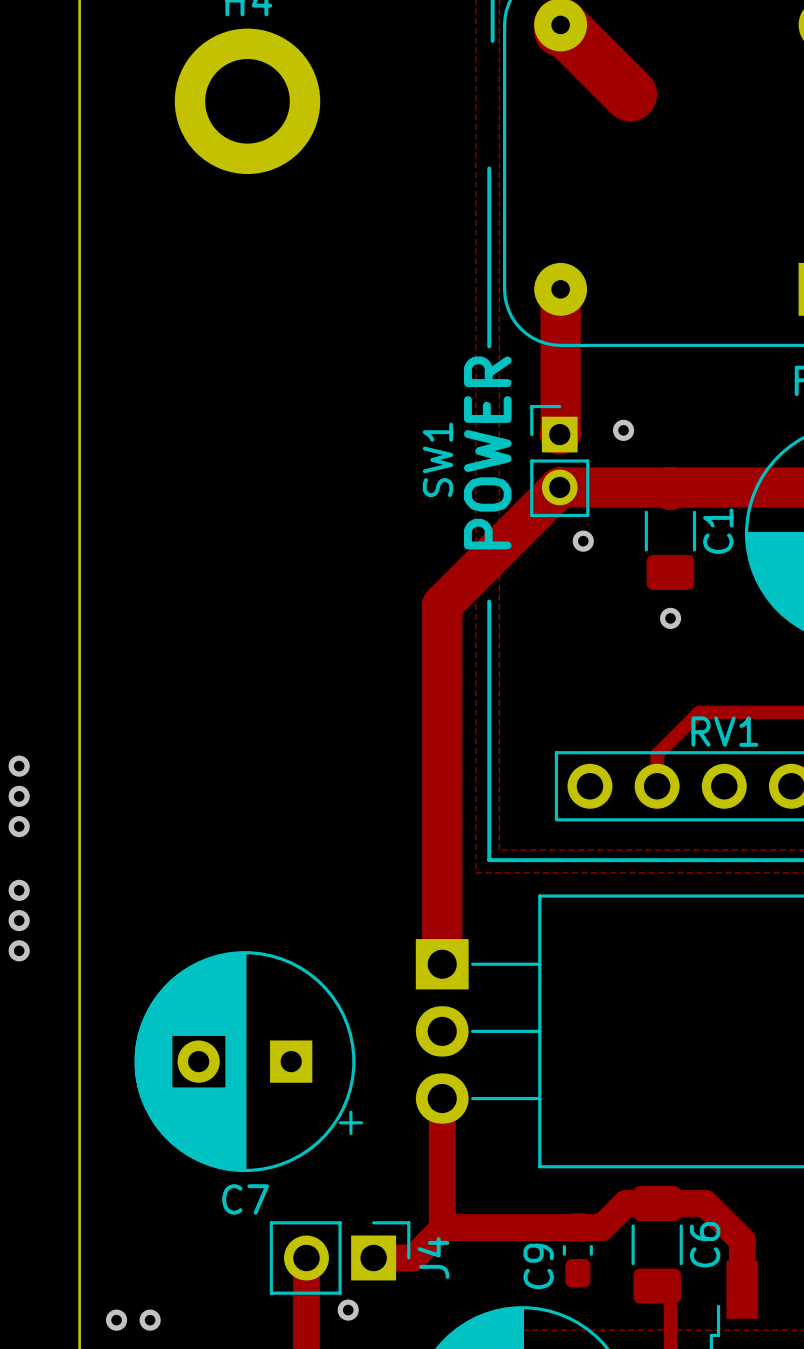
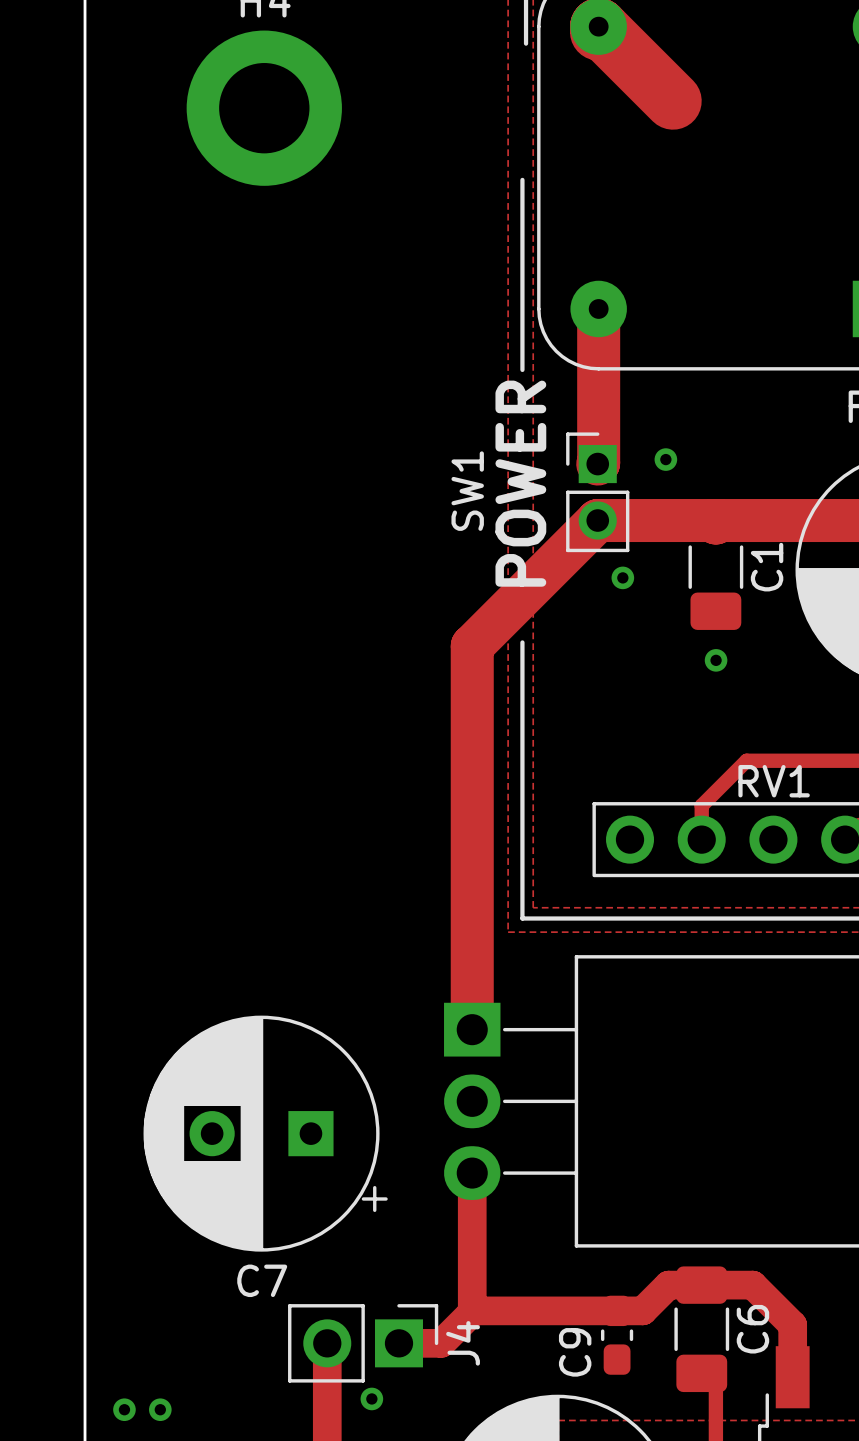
via: (19, 766) -> none
via: (19, 796) -> none
via: (19, 826) -> none
via: (19, 890) -> none
via: (19, 920) -> none
via: (19, 950) -> none

